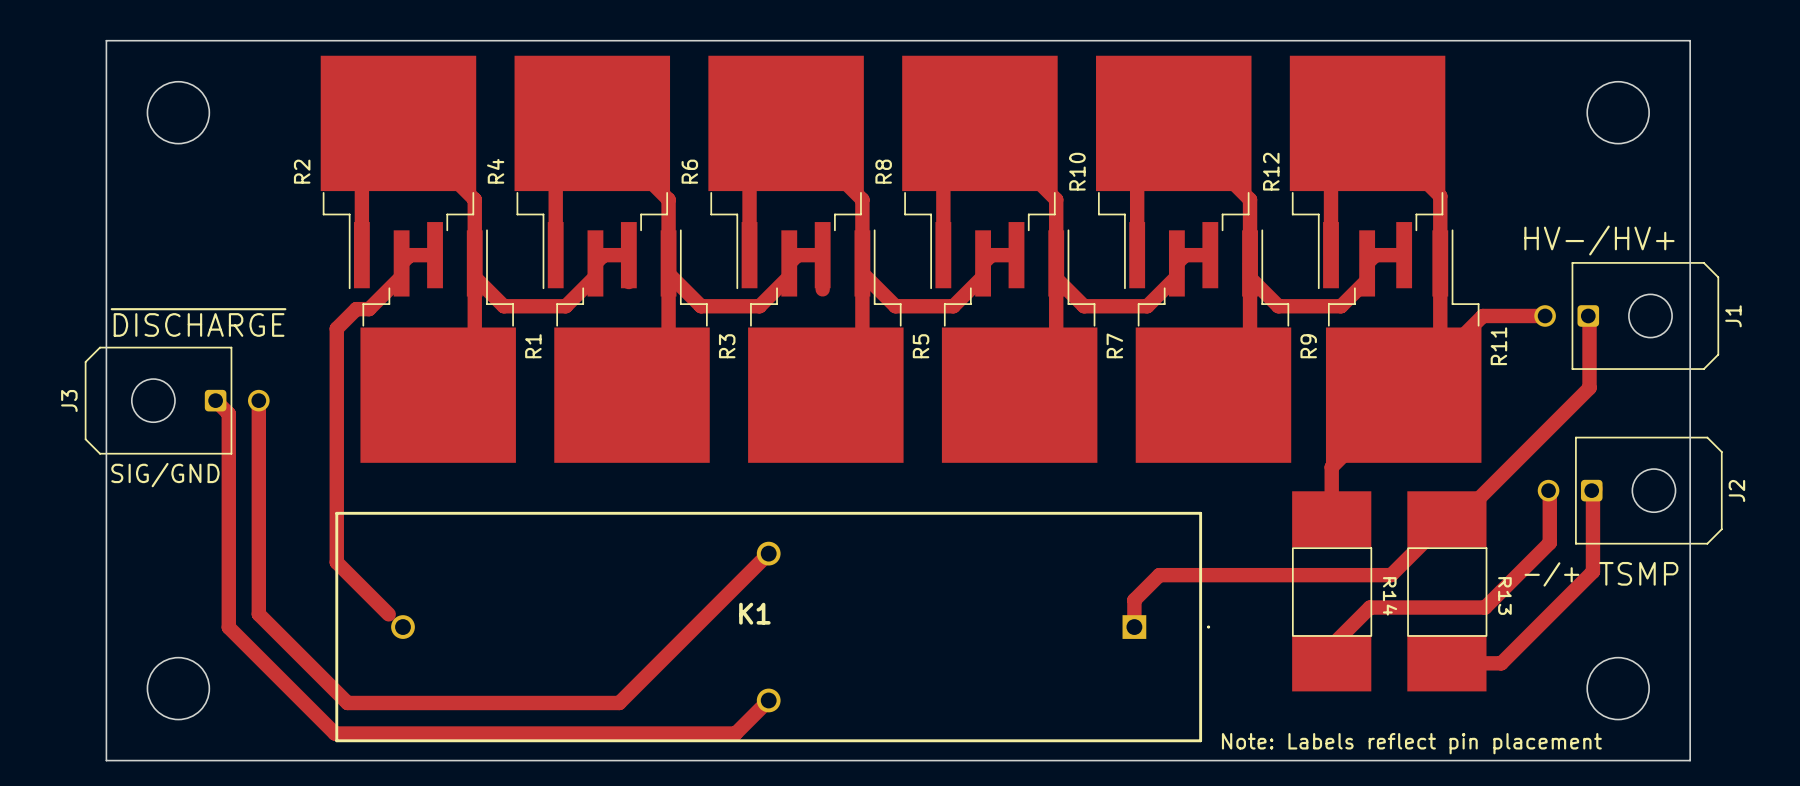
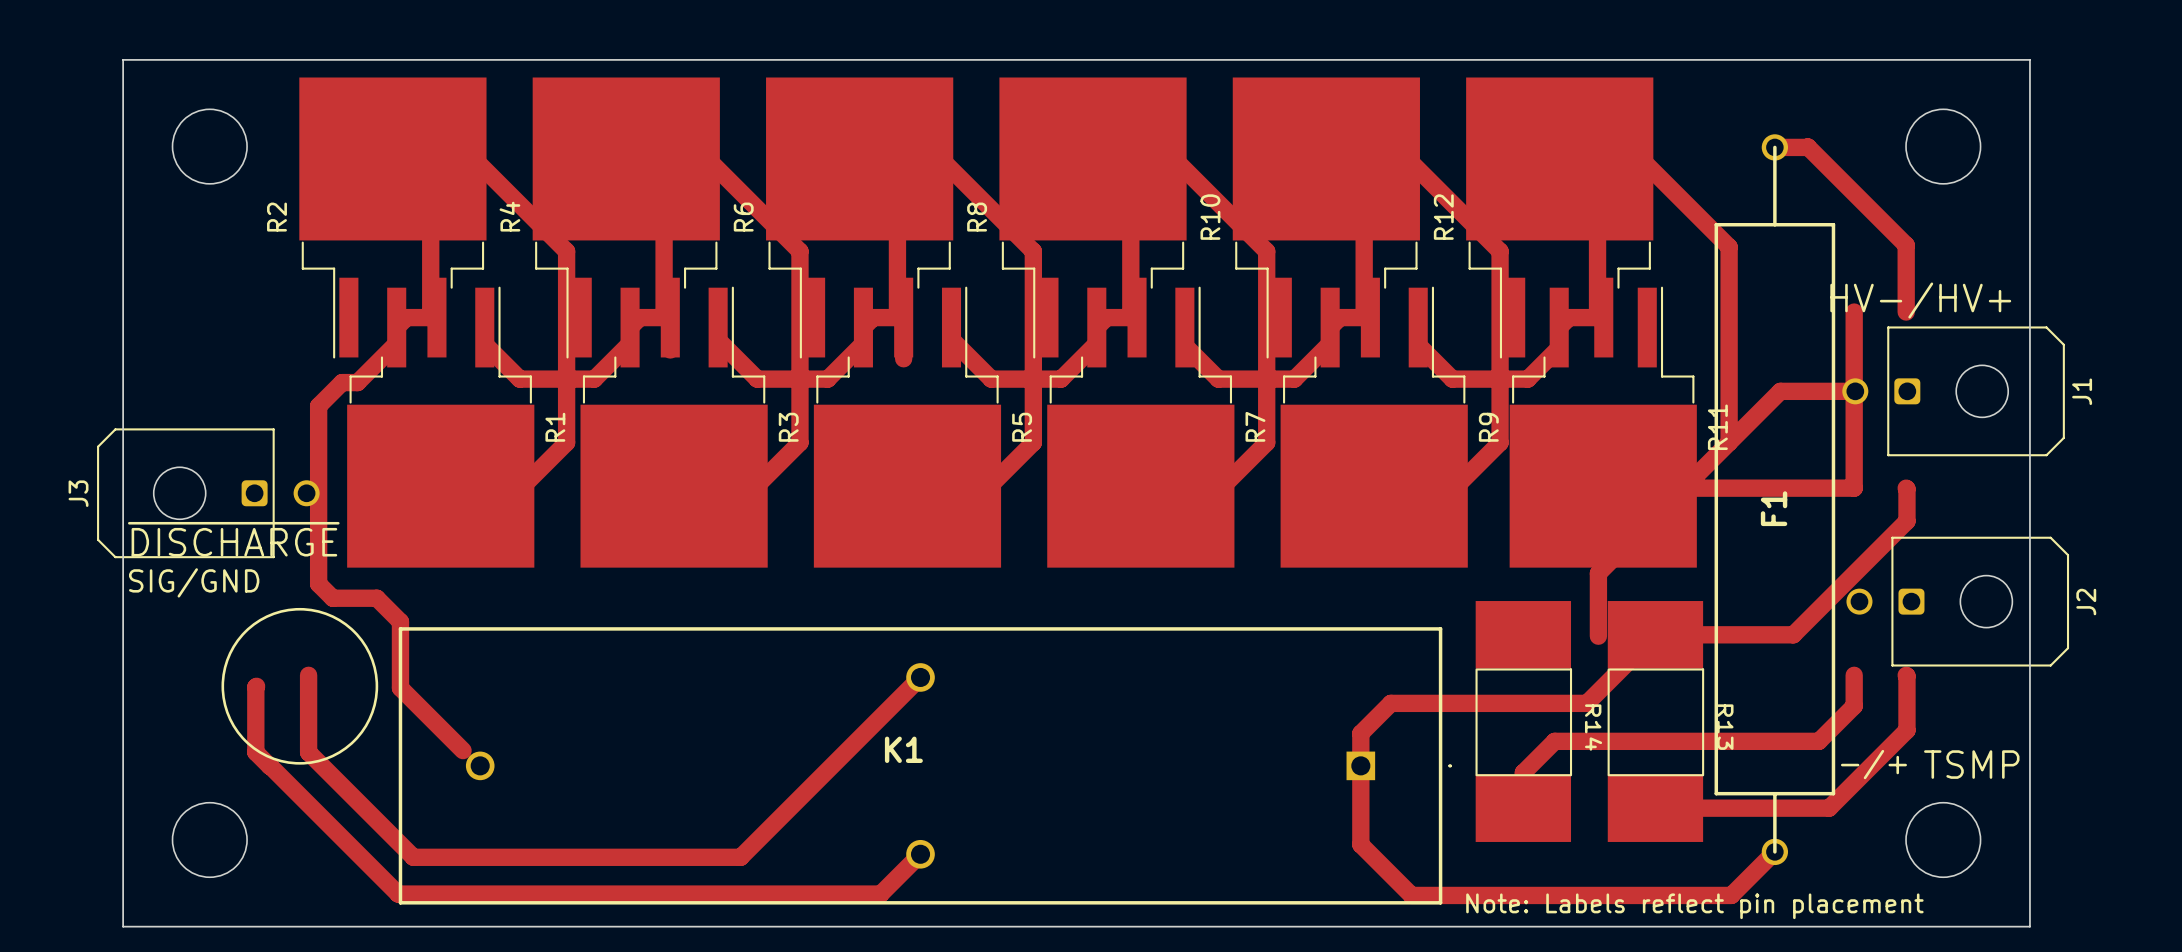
top track: none -> (1774, 147) (1807, 146) (1906, 245) (1906, 312)
R2 position: (398, 172) -> (392, 218)
R4 position: (592, 172) -> (626, 218)
R6 position: (786, 172) -> (859, 218)
R8 position: (979, 172) -> (1093, 218)
R10 position: (1173, 172) -> (1326, 218)
R12 position: (1367, 172) -> (1559, 218)
top track: none -> (1854, 312) (1854, 488) (1605, 488) (1603, 486)
top track: (1210, 255) (1185, 255) (1176, 263) (1176, 276) (1147, 306) (1084, 306) (1056, 278) -> (1370, 317) (1340, 317) (1330, 327) (1330, 343) (1294, 379) (1218, 379) (1184, 345)
top track: (1404, 255) (1375, 255) (1367, 263) (1367, 280) (1341, 306) (1278, 306) (1250, 277) -> (1603, 317) (1569, 317) (1559, 327) (1559, 347) (1527, 379) (1452, 379) (1418, 344)
top track: (668, 273) (701, 306) (759, 306) (789, 276) (789, 263) (797, 255) (822, 255) (822, 289) -> (718, 339) (757, 379) (827, 379) (863, 343) (863, 327) (873, 317) (903, 317) (903, 358)
top track: (862, 273) (895, 306) (953, 306) (983, 276) (983, 263) (991, 255) (1016, 255) (1016, 278) -> (951, 339) (991, 379) (1061, 379) (1096, 343) (1096, 327) (1106, 317) (1137, 317) (1137, 345)
top track: (435, 274) (435, 255) (409, 255) (401, 263) (401, 276) (369, 309) (356, 309) (336, 328) (336, 507) -> (436, 341) (436, 317) (406, 317) (396, 327) (396, 343) (357, 382) (342, 382) (318, 406) (318, 584) (332, 598) (376, 598) (400, 621)
top track: (474, 277) (503, 306) (565, 306) (595, 276) (595, 263) (603, 255) (628, 255) (628, 282) -> (484, 344) (519, 379) (594, 379) (630, 343) (630, 327) (640, 317) (670, 317) (670, 349)
top track: (1588, 315) (1589, 387) (1458, 519) (1446, 519) (1391, 575) (1322, 575) -> (1906, 488) (1906, 521) (1793, 634) (1655, 634) (1586, 703)
text position: ~{DISCHARGE} (198, 322) -> ~{DISCHARGE} (233, 539)
R1 position: (438, 346) -> (440, 427)
R3 position: (632, 346) -> (674, 427)
R5 position: (825, 346) -> (907, 427)
R7 position: (1019, 346) -> (1140, 427)
R9 position: (1213, 346) -> (1374, 427)
R11 position: (1403, 346) -> (1603, 427)
top track: (215, 400) (228, 413) (228, 627) -> (256, 686) (255, 752) (270, 766)
top track: (258, 400) (258, 614) (260, 615) -> (308, 675) (308, 752)
F1: none -> (1774, 499)
top track: (1595, 488) (1592, 491) (1592, 571) (1501, 663) (1446, 663) -> none
top track: (1549, 491) (1549, 542) (1485, 607) (1369, 607) (1331, 645) (1331, 663) -> none
drawing: none -> [221, 607, 379, 765]
top track: none -> (1854, 675) (1854, 706) (1818, 741) (1554, 741) (1523, 772) (1523, 808)
top track: none -> (1906, 675) (1906, 730) (1829, 808) (1655, 808)
text position: TSMP (1638, 573) -> TSMP (1971, 764)
text position: -/+ (1551, 574) -> -/+ (1873, 764)
R14 position: (1332, 591) -> (1523, 721)
R13 position: (1447, 591) -> (1655, 721)
top track: none -> (1360, 765) (1360, 844) (1411, 895) (1731, 895) (1774, 851)

